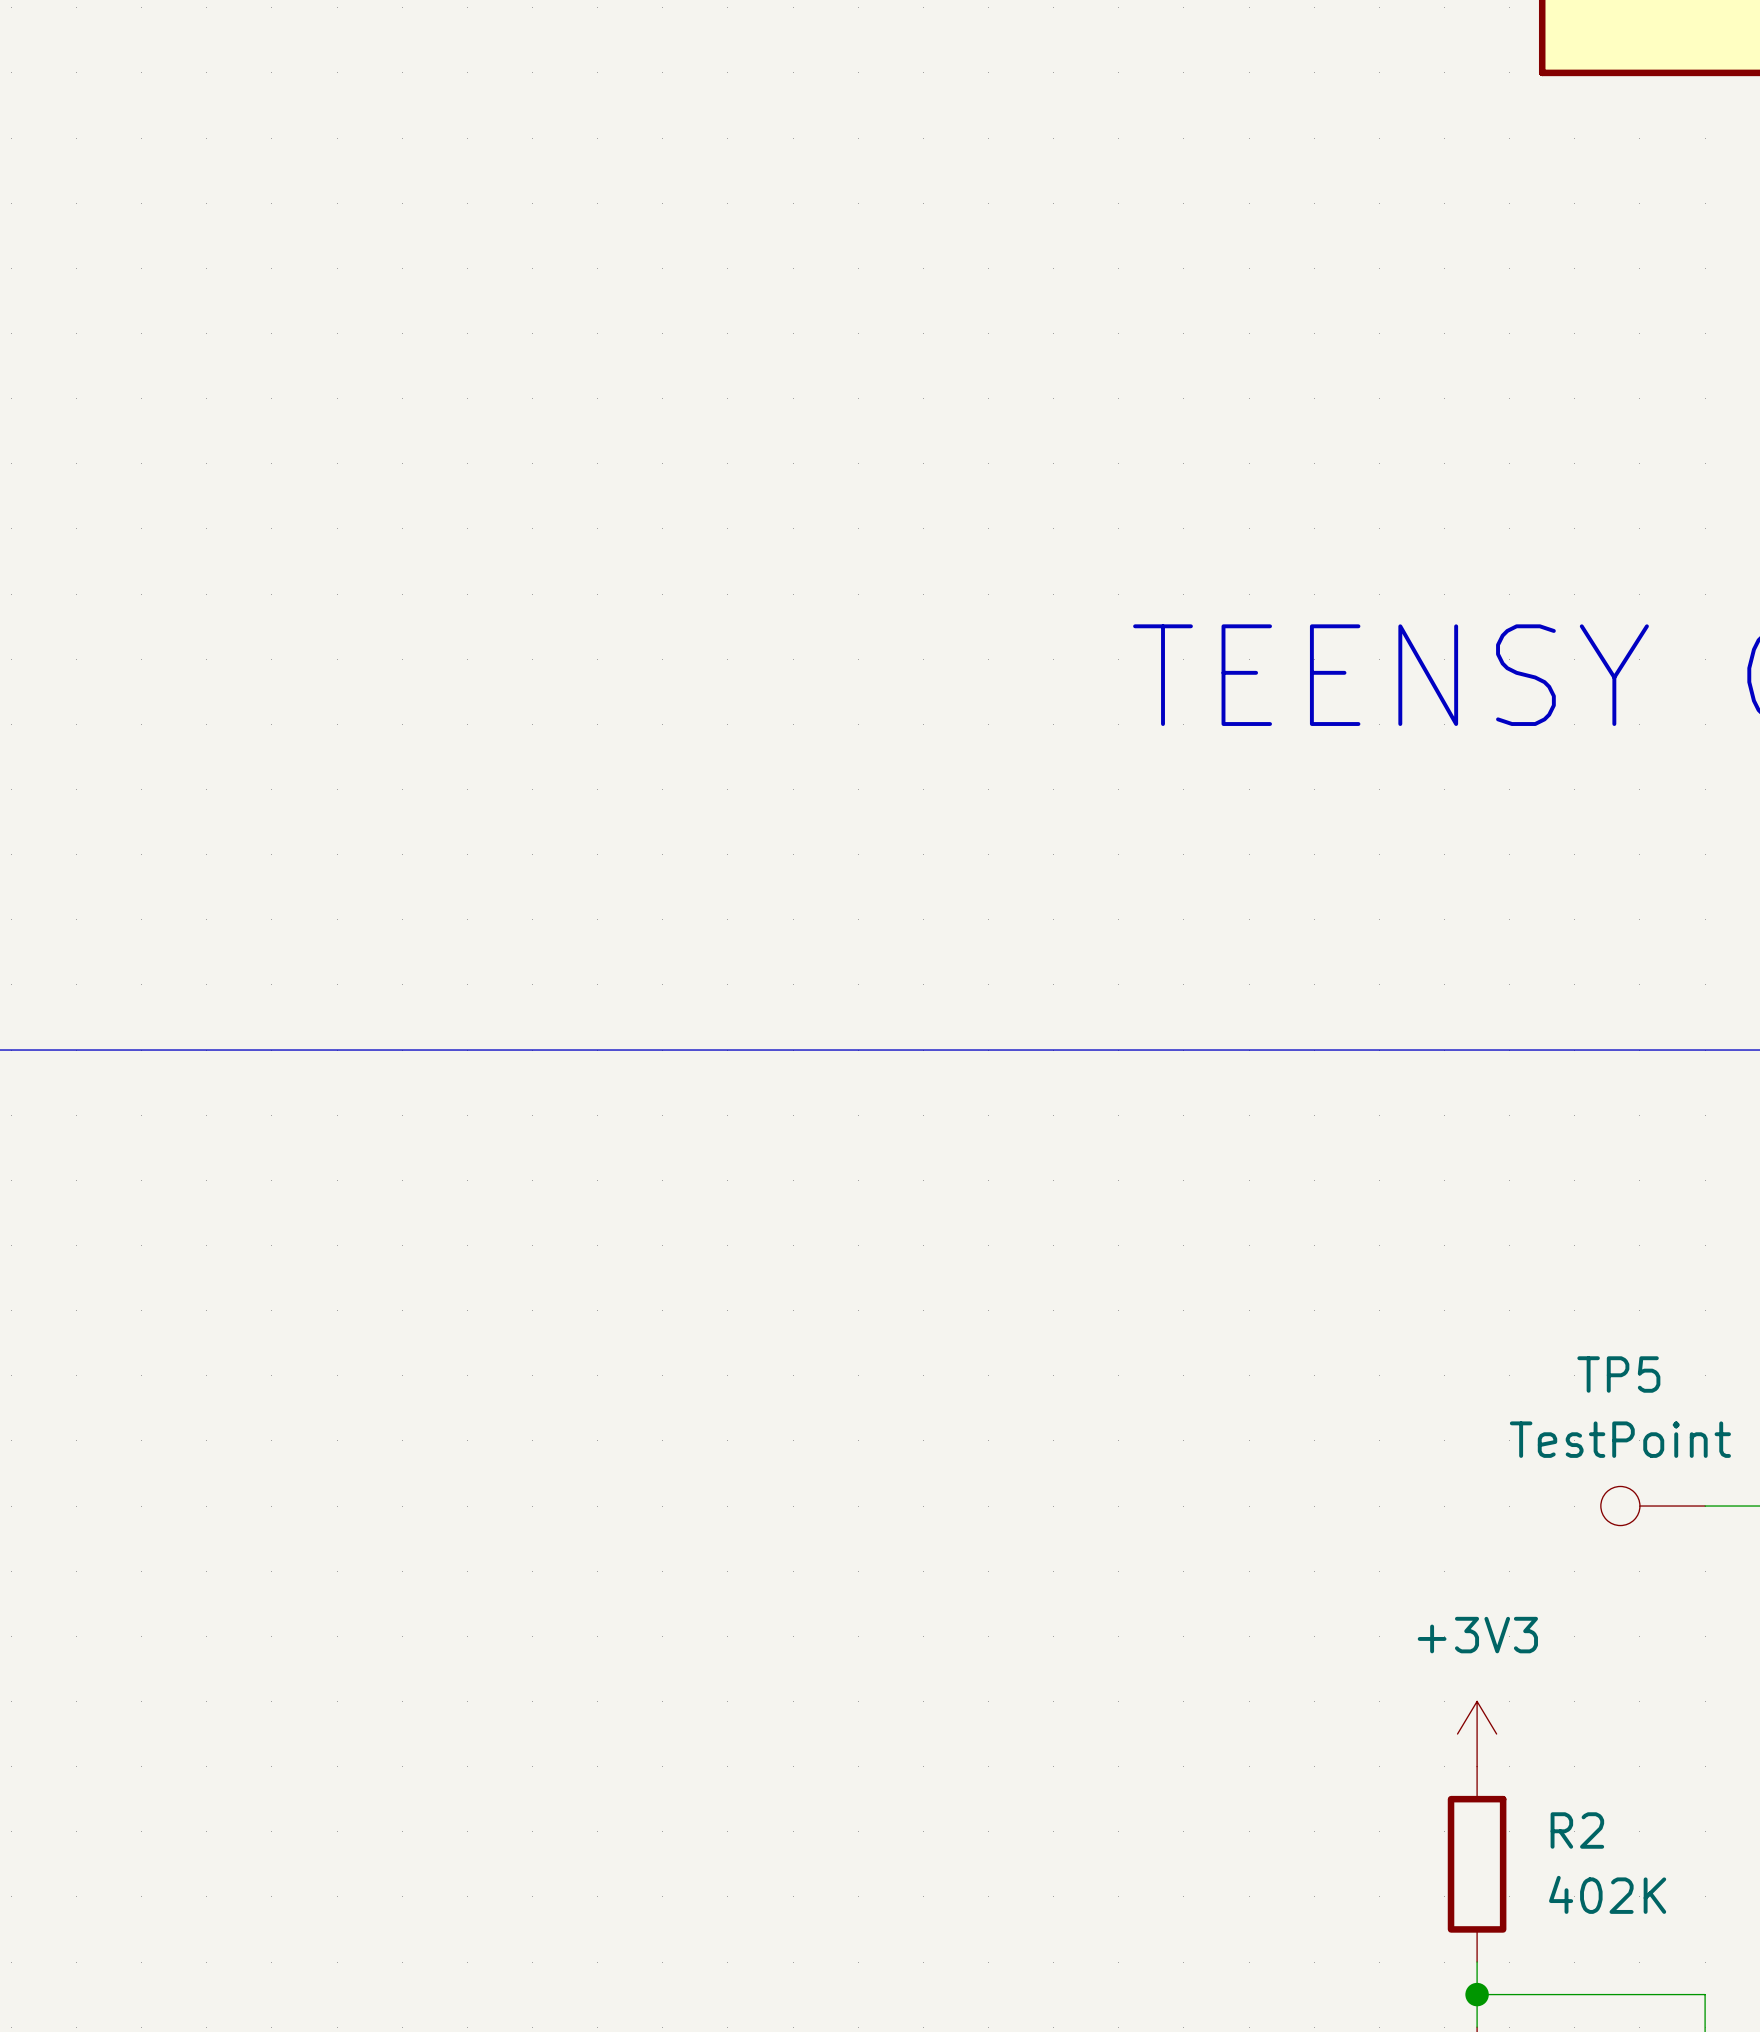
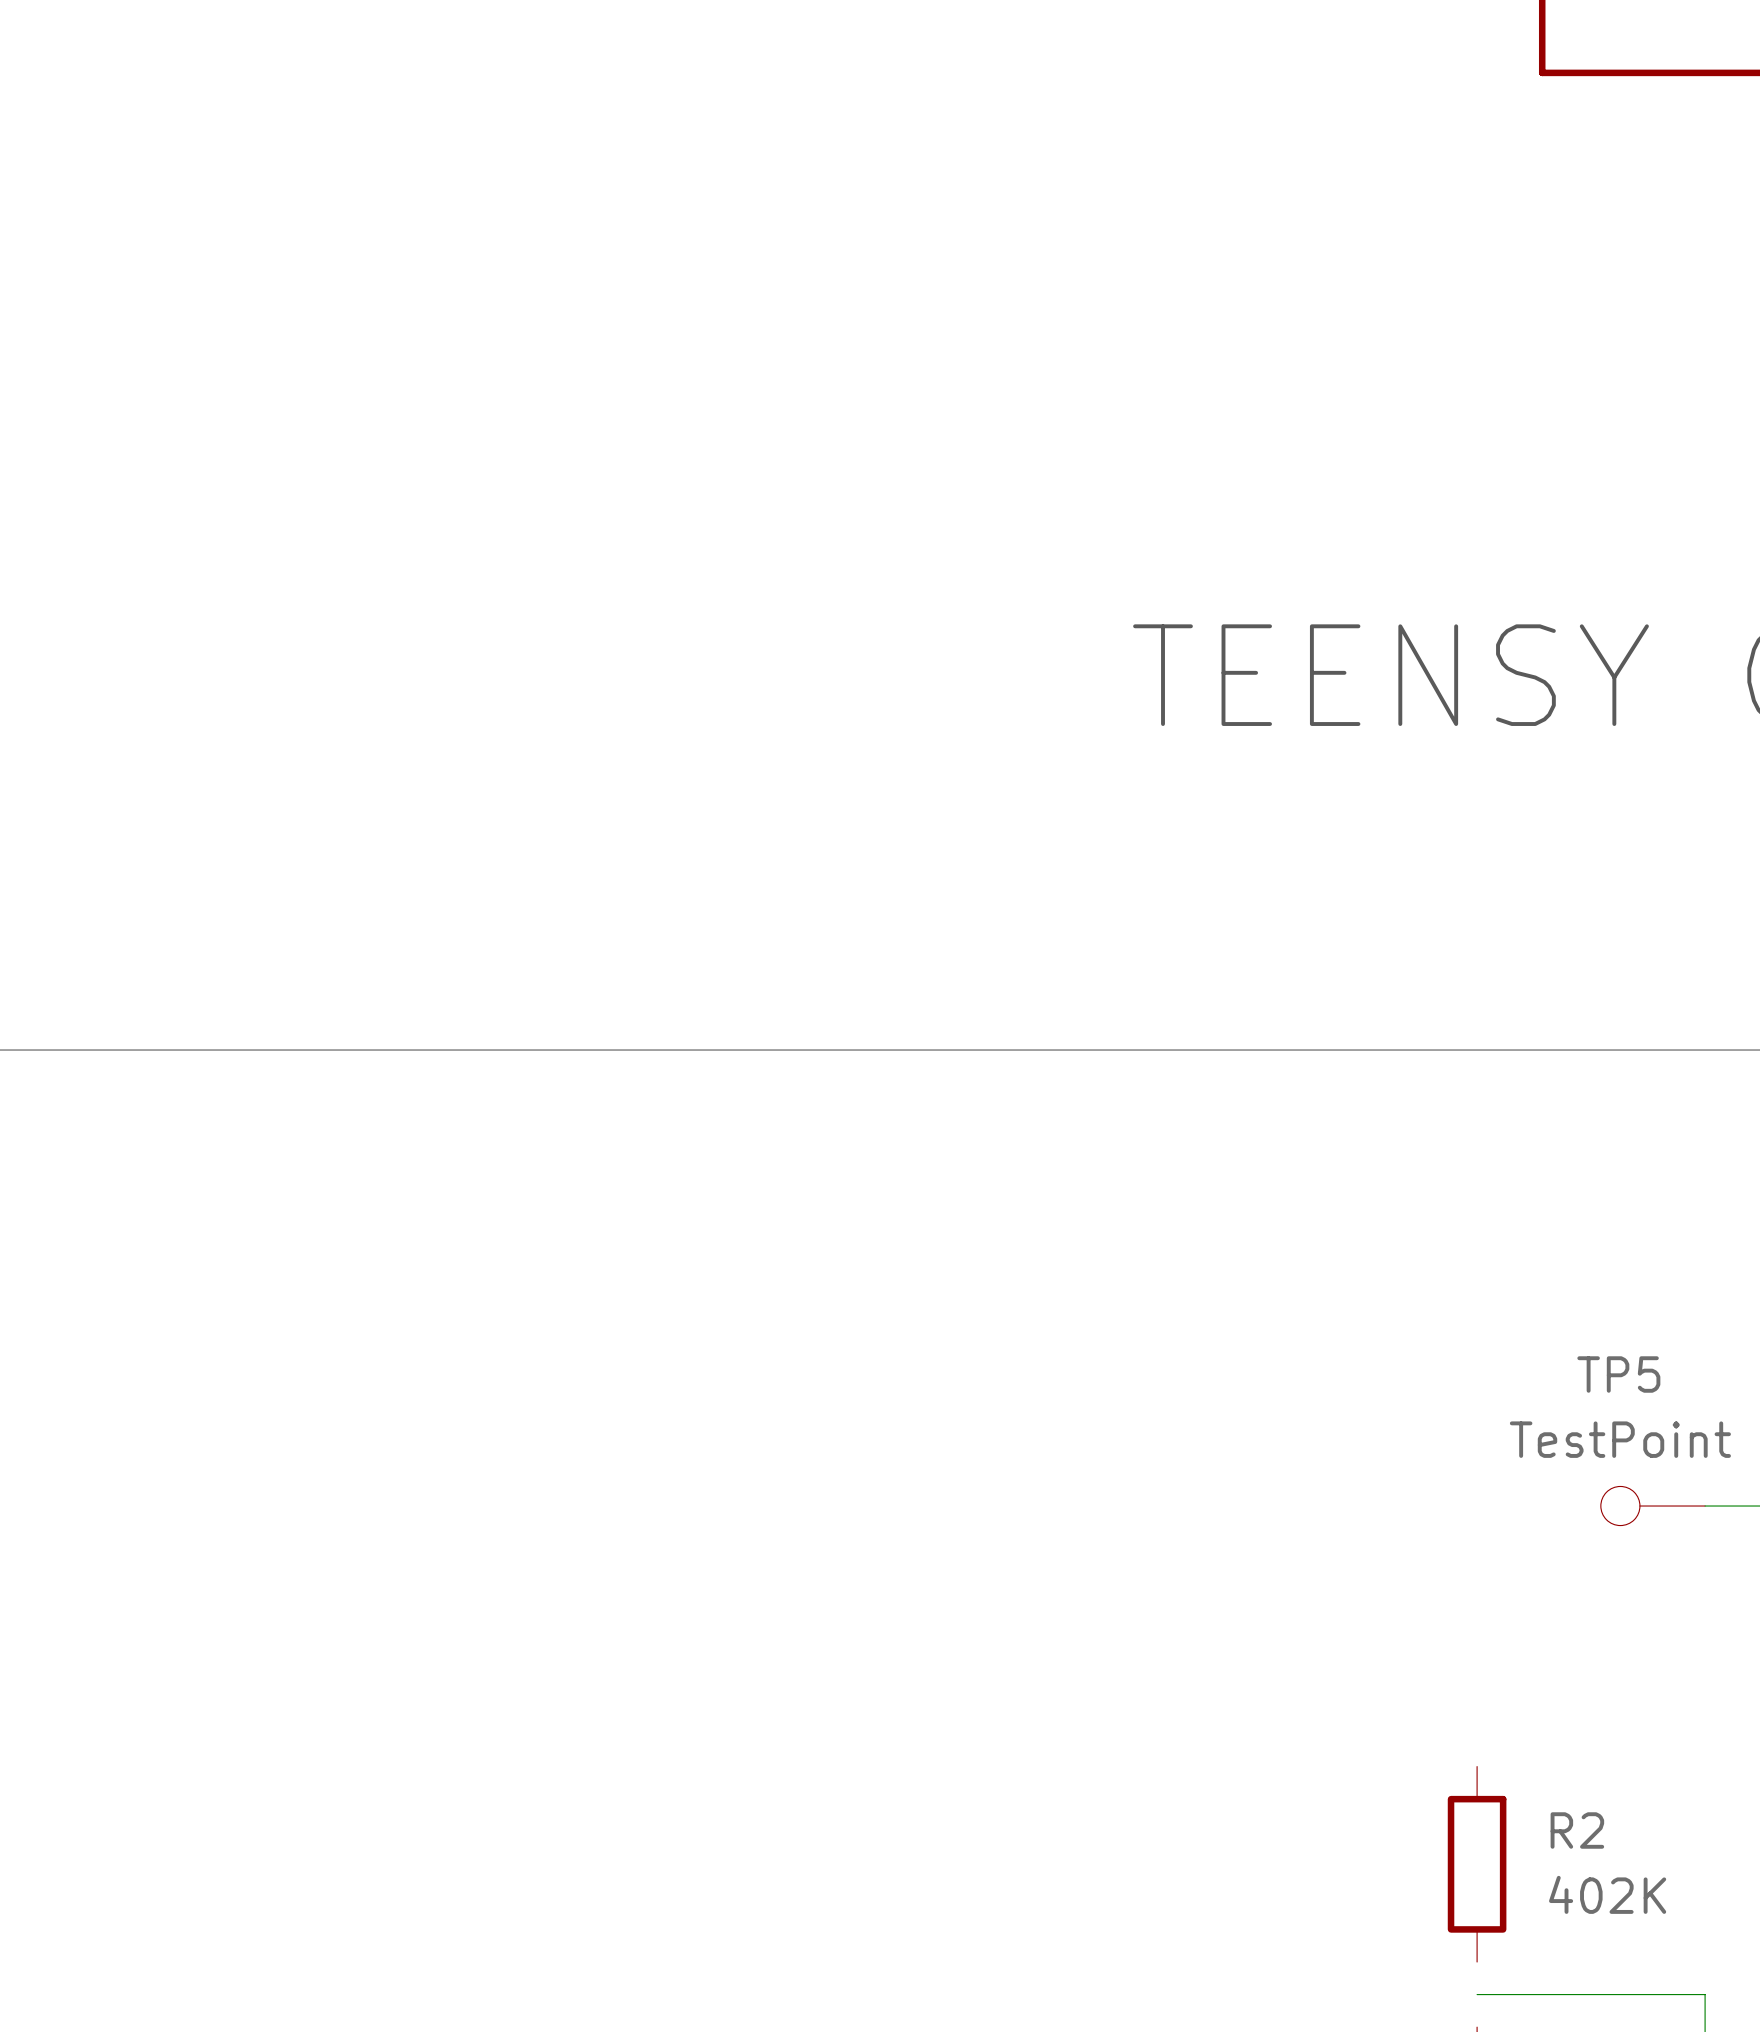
power symbol: +3V3 (1477, 1734) -> none
wire: (1477, 1962) (1477, 2027) -> none
junction: (1477, 1994) -> none

